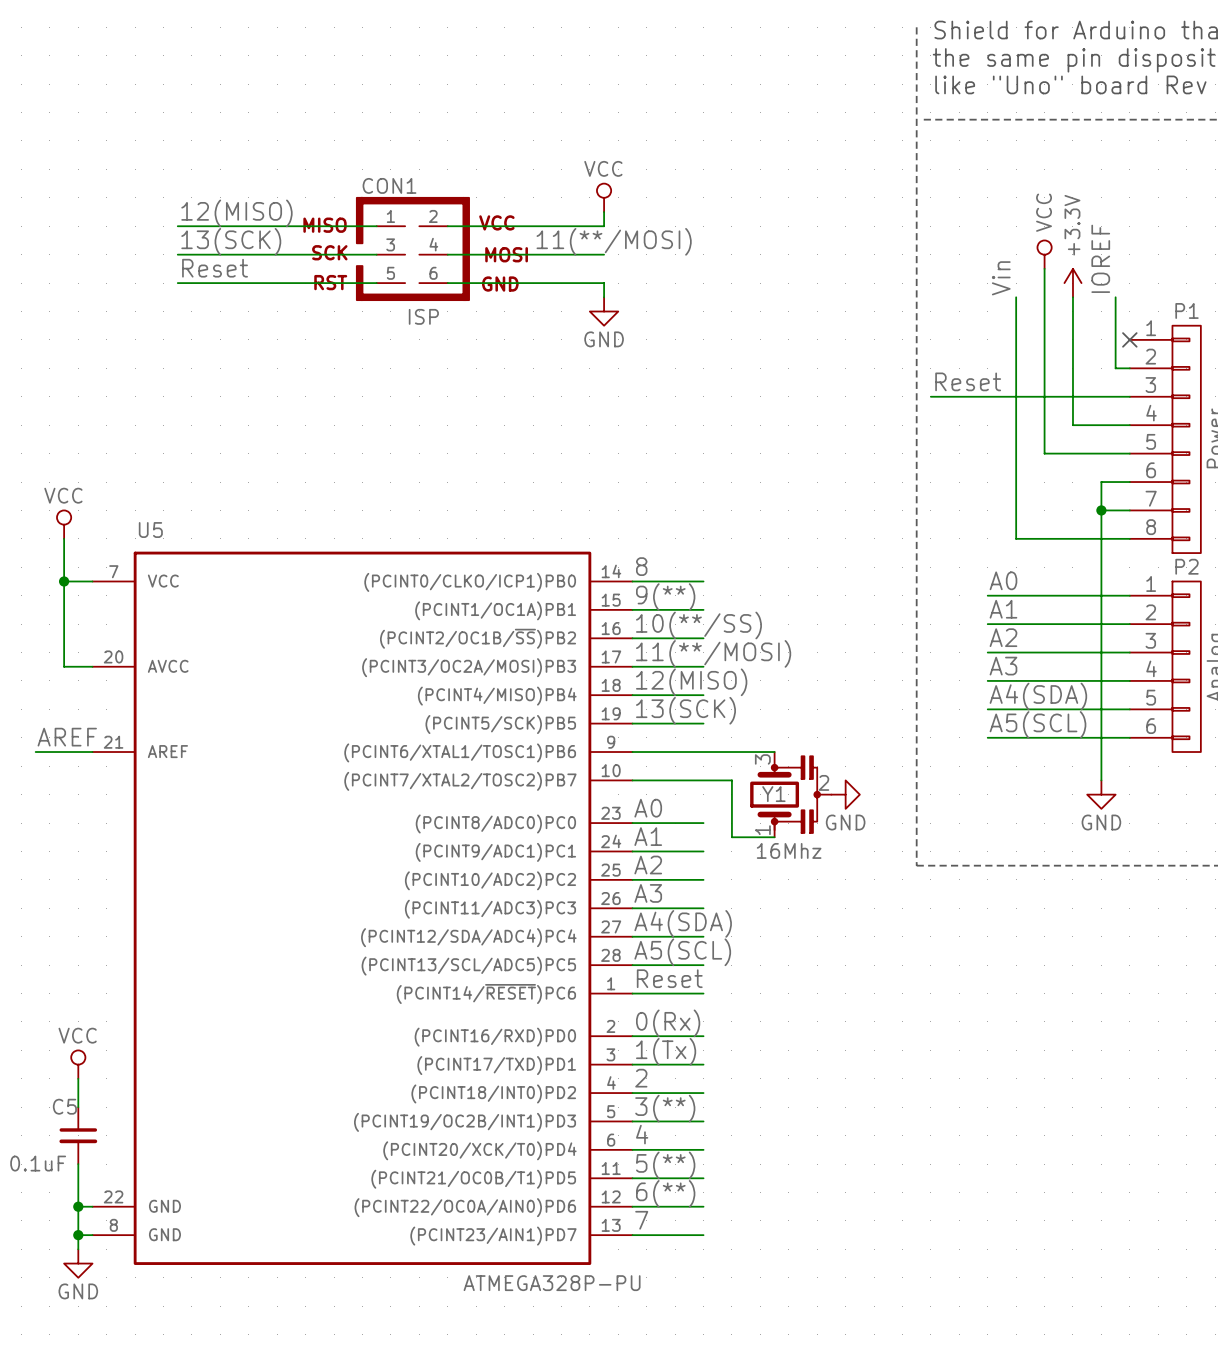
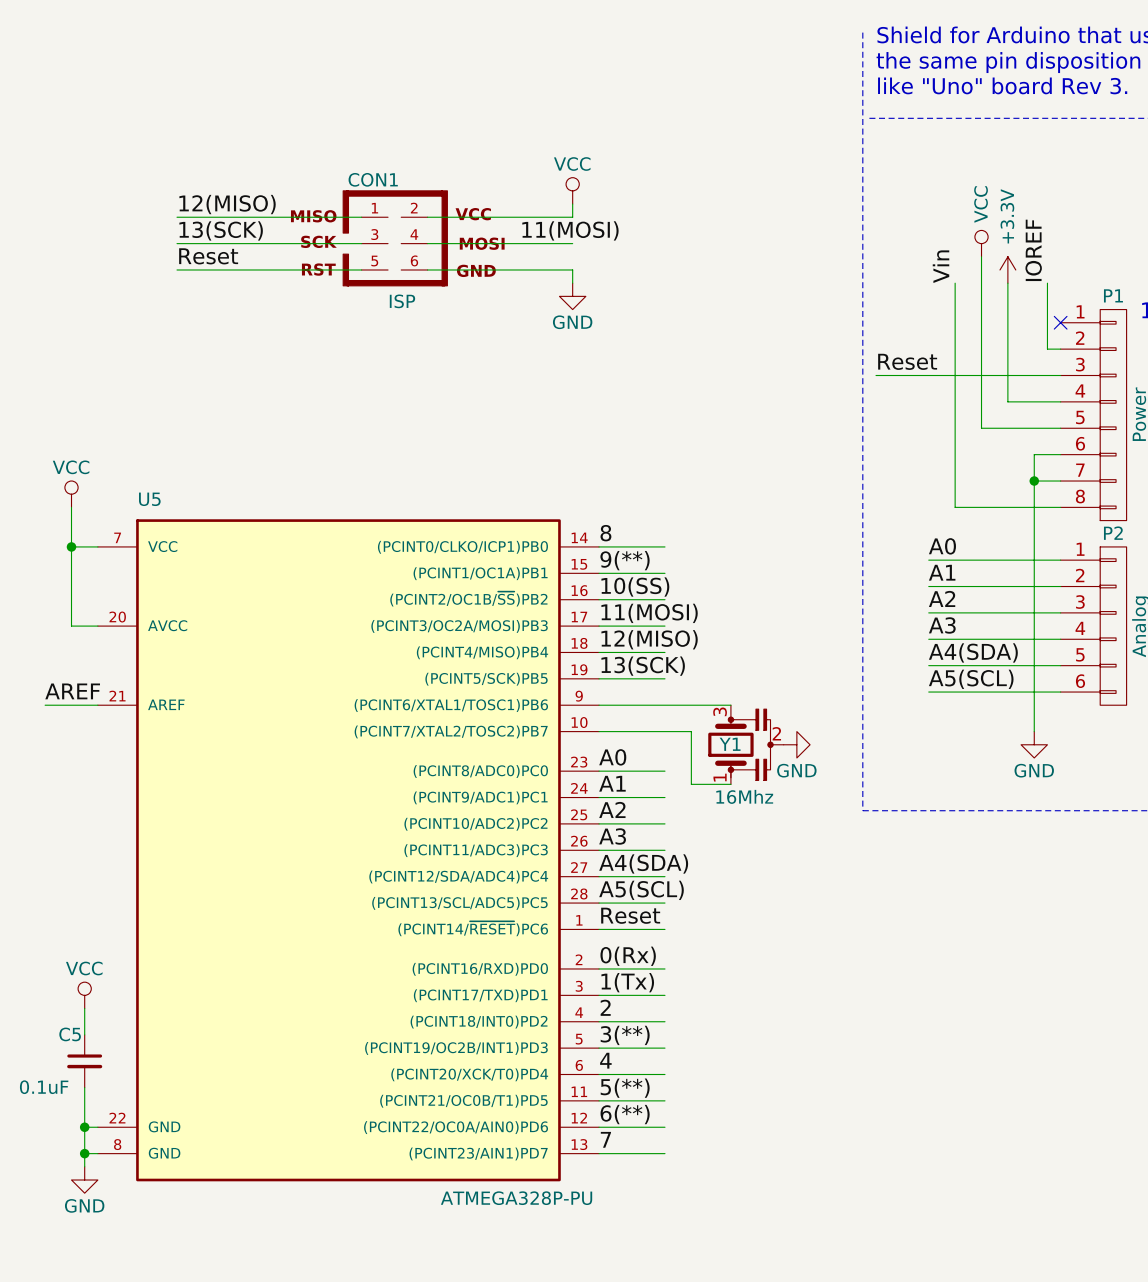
label: 11(**/MOSI) (614, 241) -> 11(MOSI) (570, 230)
label: 10(**/SS) (698, 625) -> 10(SS) (635, 587)
label: 11(**/MOSI) (713, 653) -> 11(MOSI) (649, 613)

